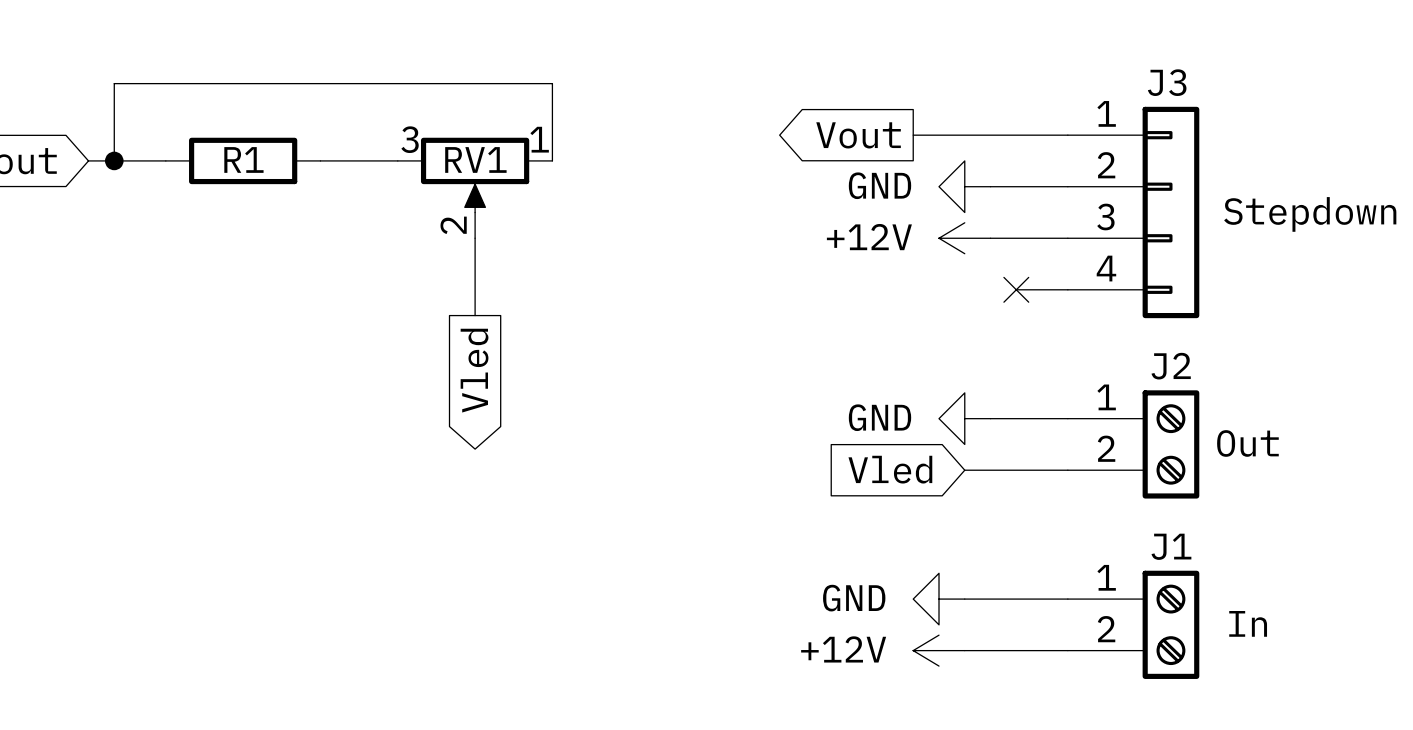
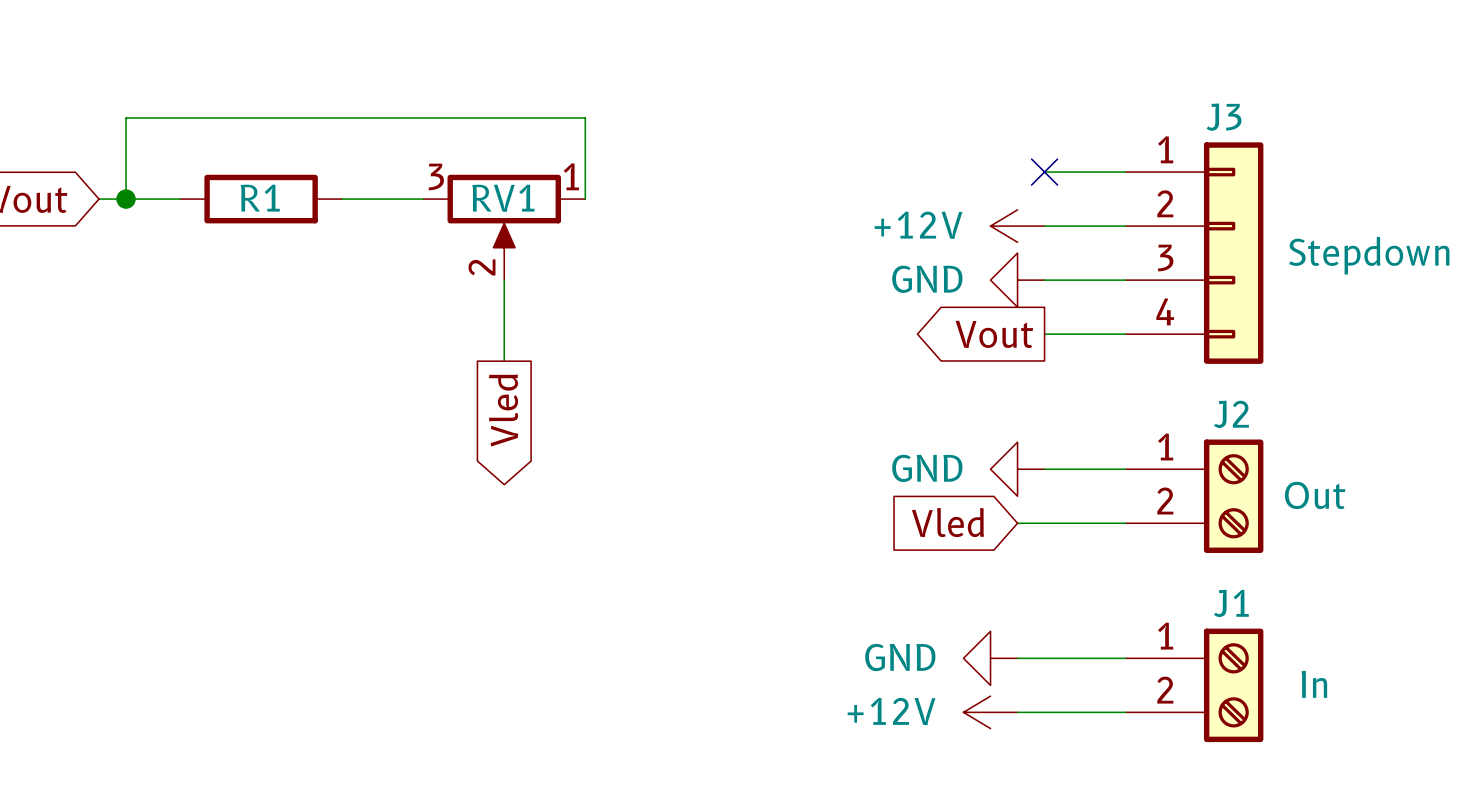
global label position: Vout (858, 135) -> Vout (994, 334)
wire: (913, 135) (990, 135) -> none
no-connect mark: none -> (1044, 172)
power symbol: GND (964, 186) -> +12V (1017, 226)
power symbol: +12V (964, 238) -> GND (1017, 280)
wire: none -> (1044, 334) (1071, 334)
no-connect mark: (1016, 289) -> none

